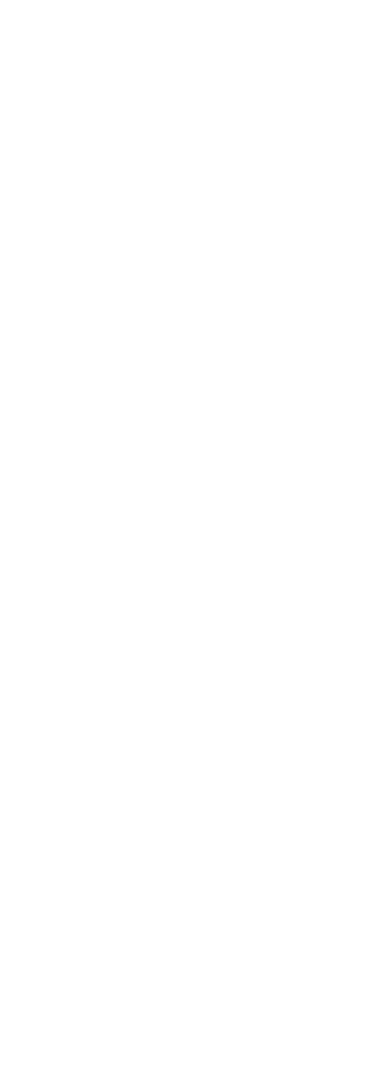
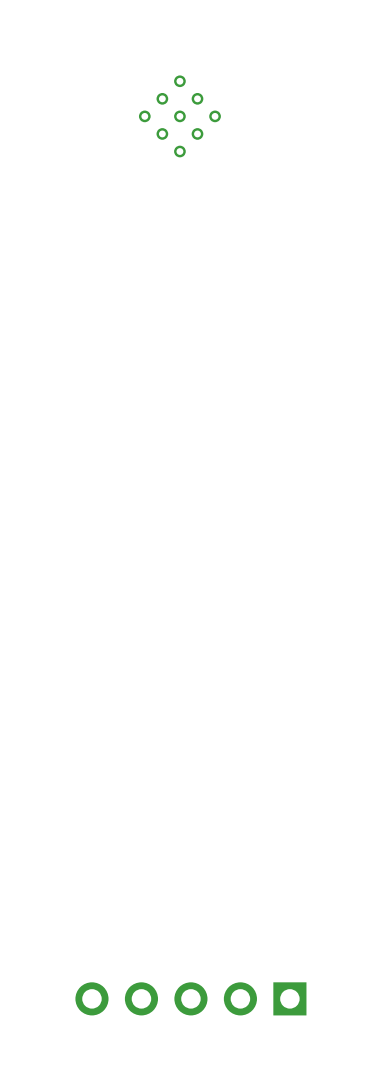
part: none -> (179, 116)
part: none -> (190, 998)

